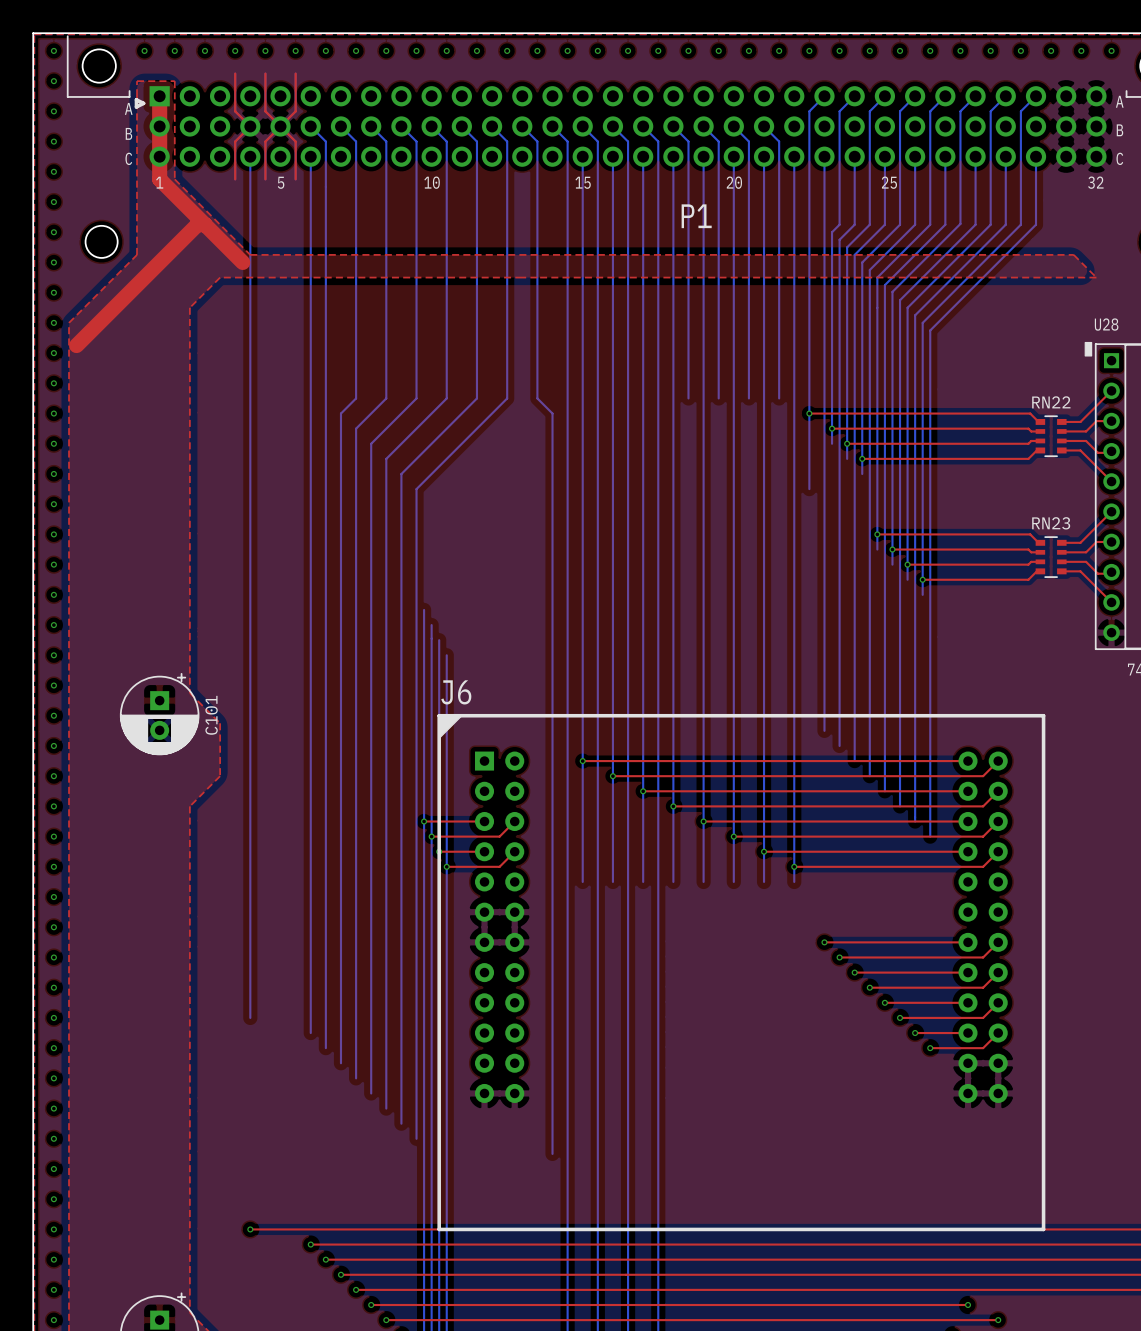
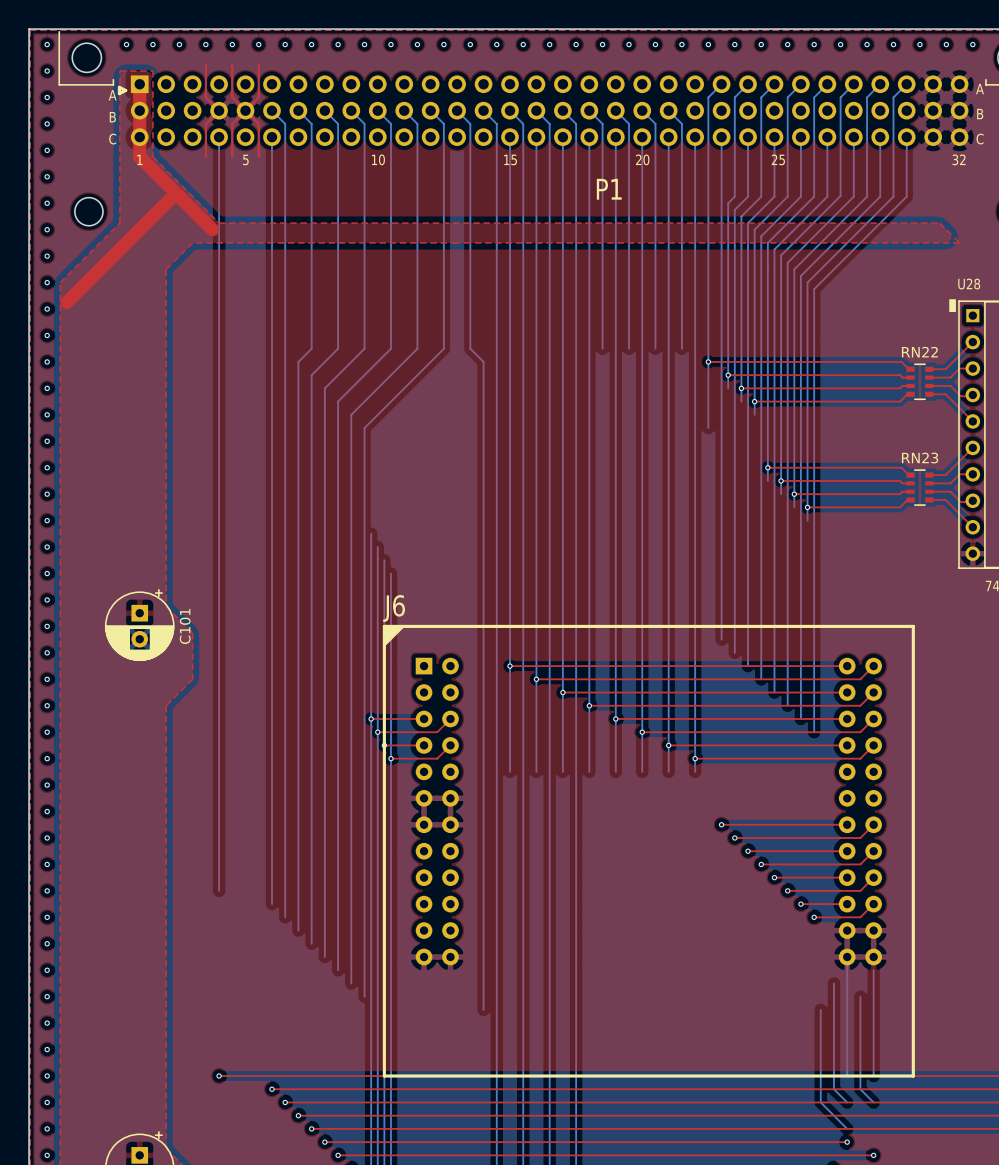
bottom track: none -> (847, 957) (847, 1076)
bottom track: none -> (873, 970) (873, 1076)
bottom track: none -> (833, 983) (833, 1089) (847, 1102)
bottom track: none -> (860, 996) (860, 1089) (873, 1102)
bottom track: none -> (820, 1009) (820, 1102) (847, 1128)

